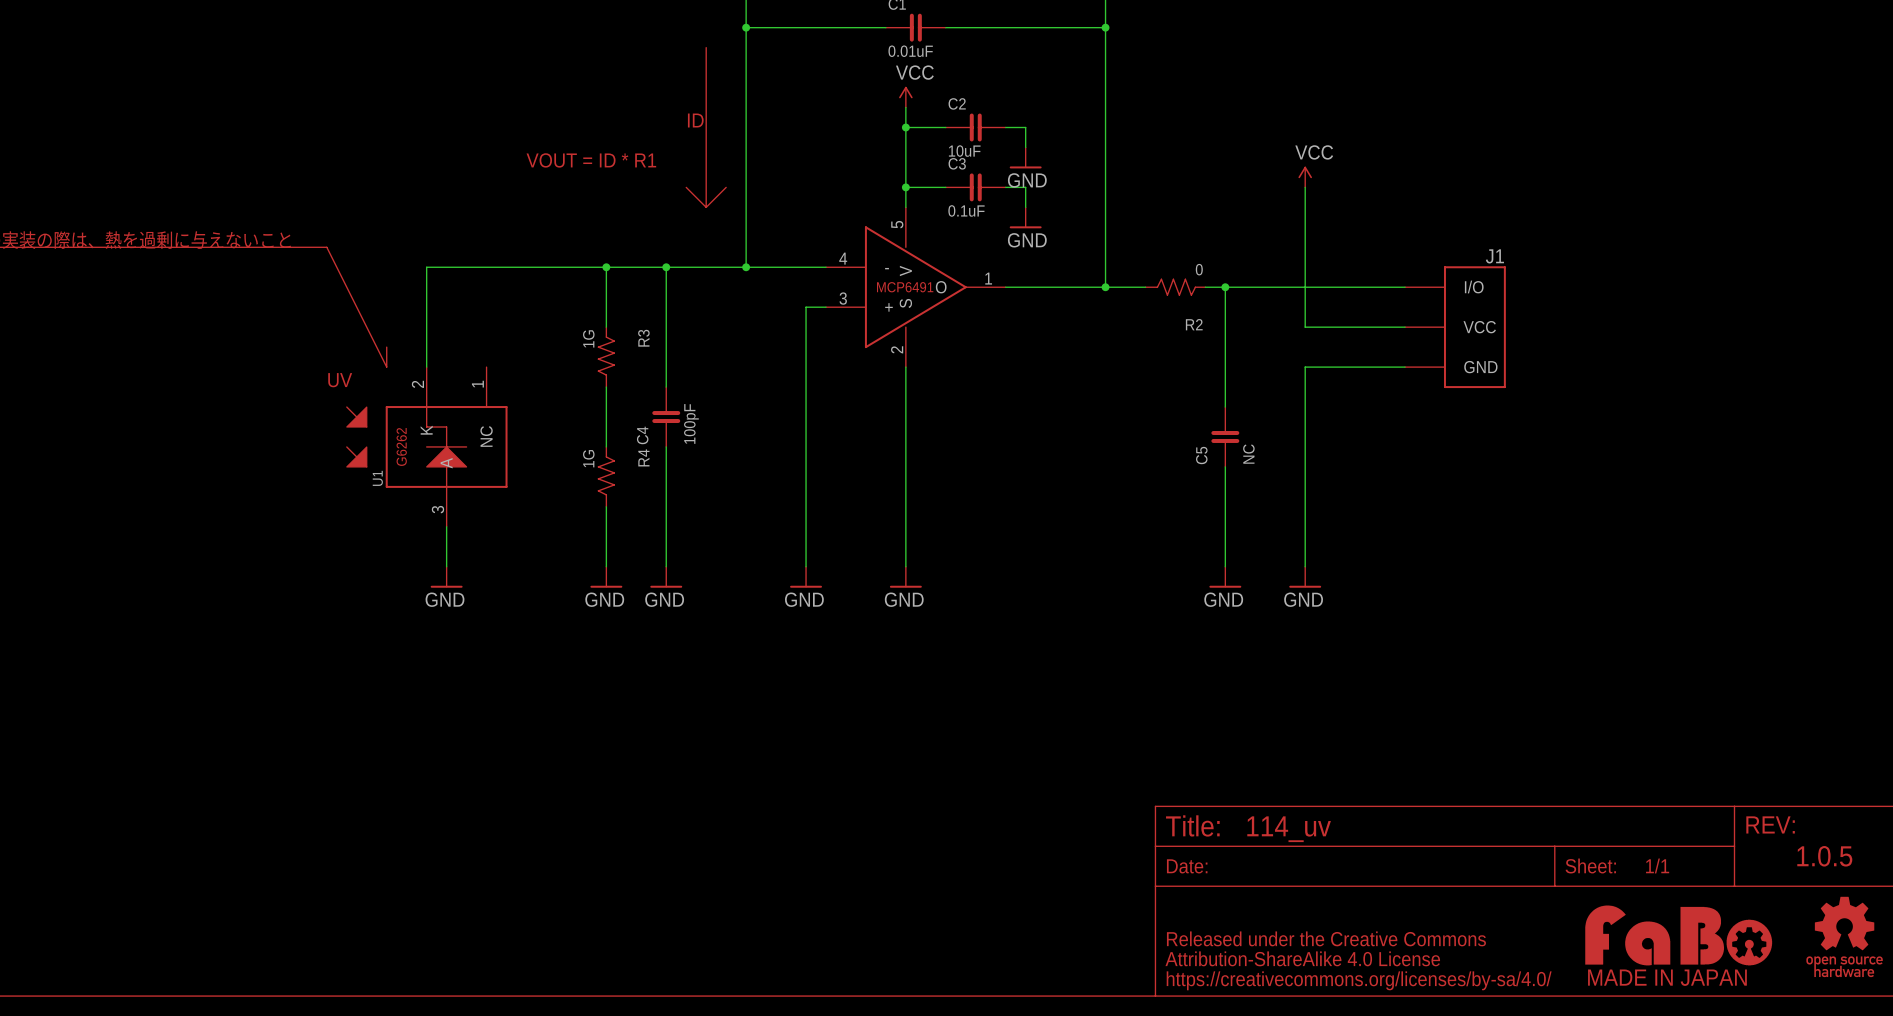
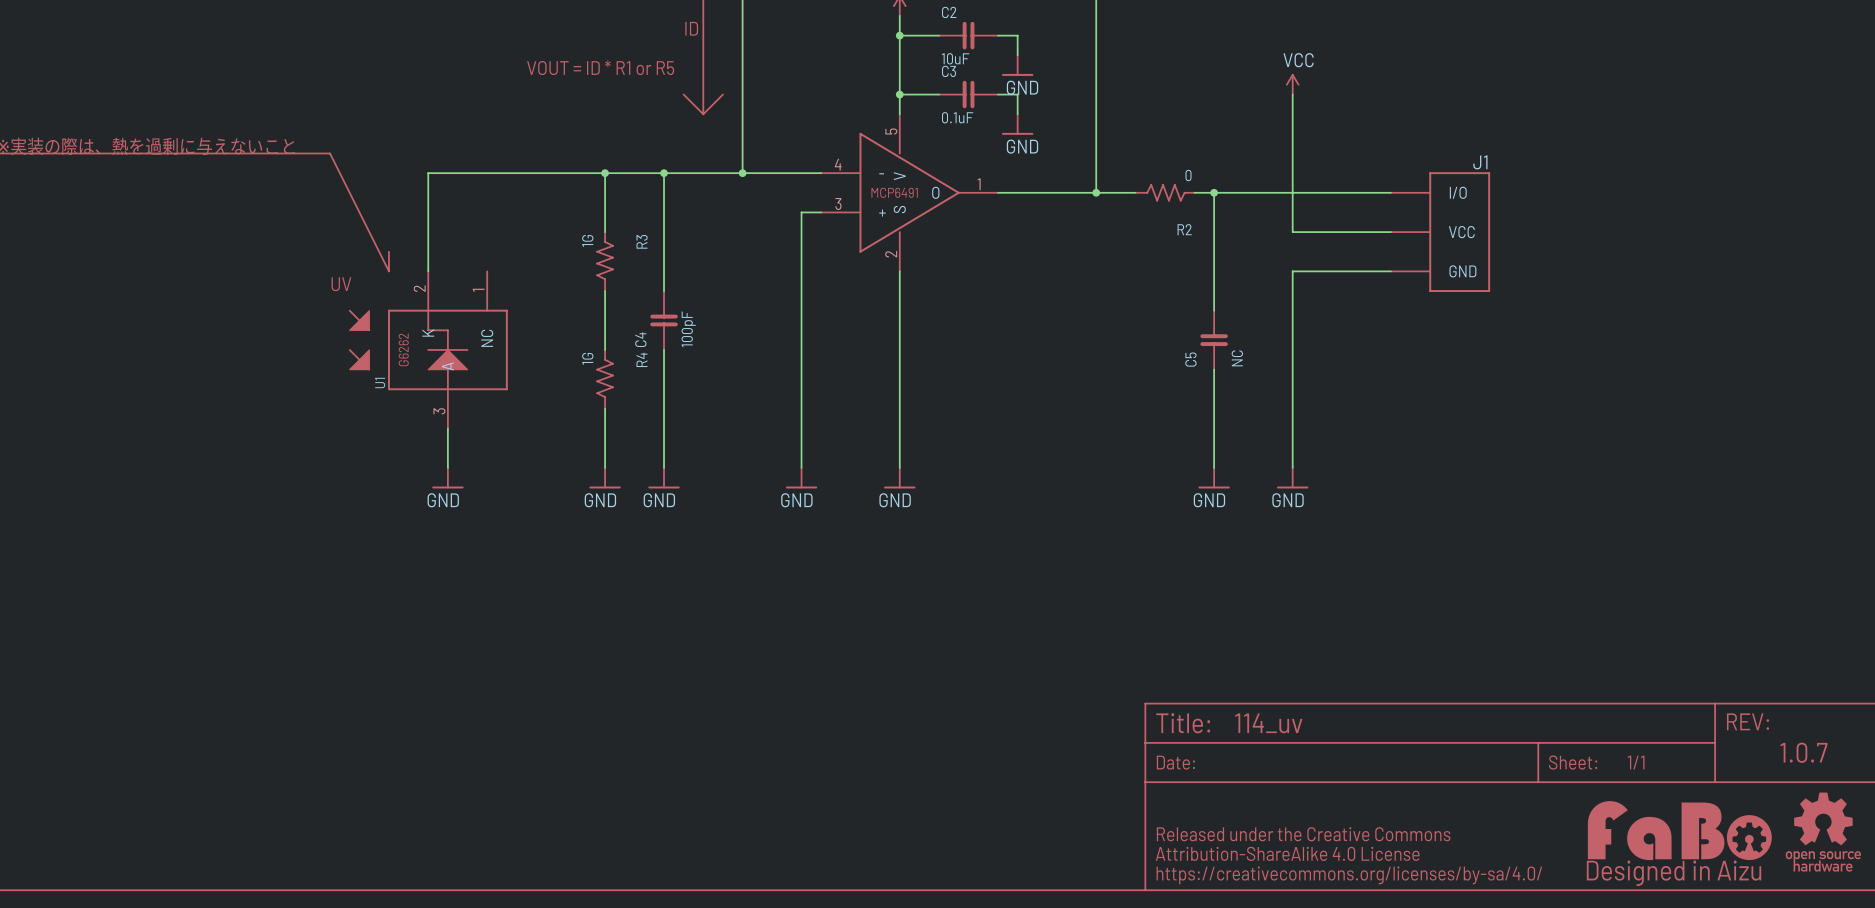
text: VOUT = ID * R1 (591, 160) -> VOUT = ID * R1 or R5 (600, 67)
text: 1.0.5 (1824, 856) -> 1.0.7 (1803, 752)
part: (1678, 935) -> none
part: none -> (1679, 830)

